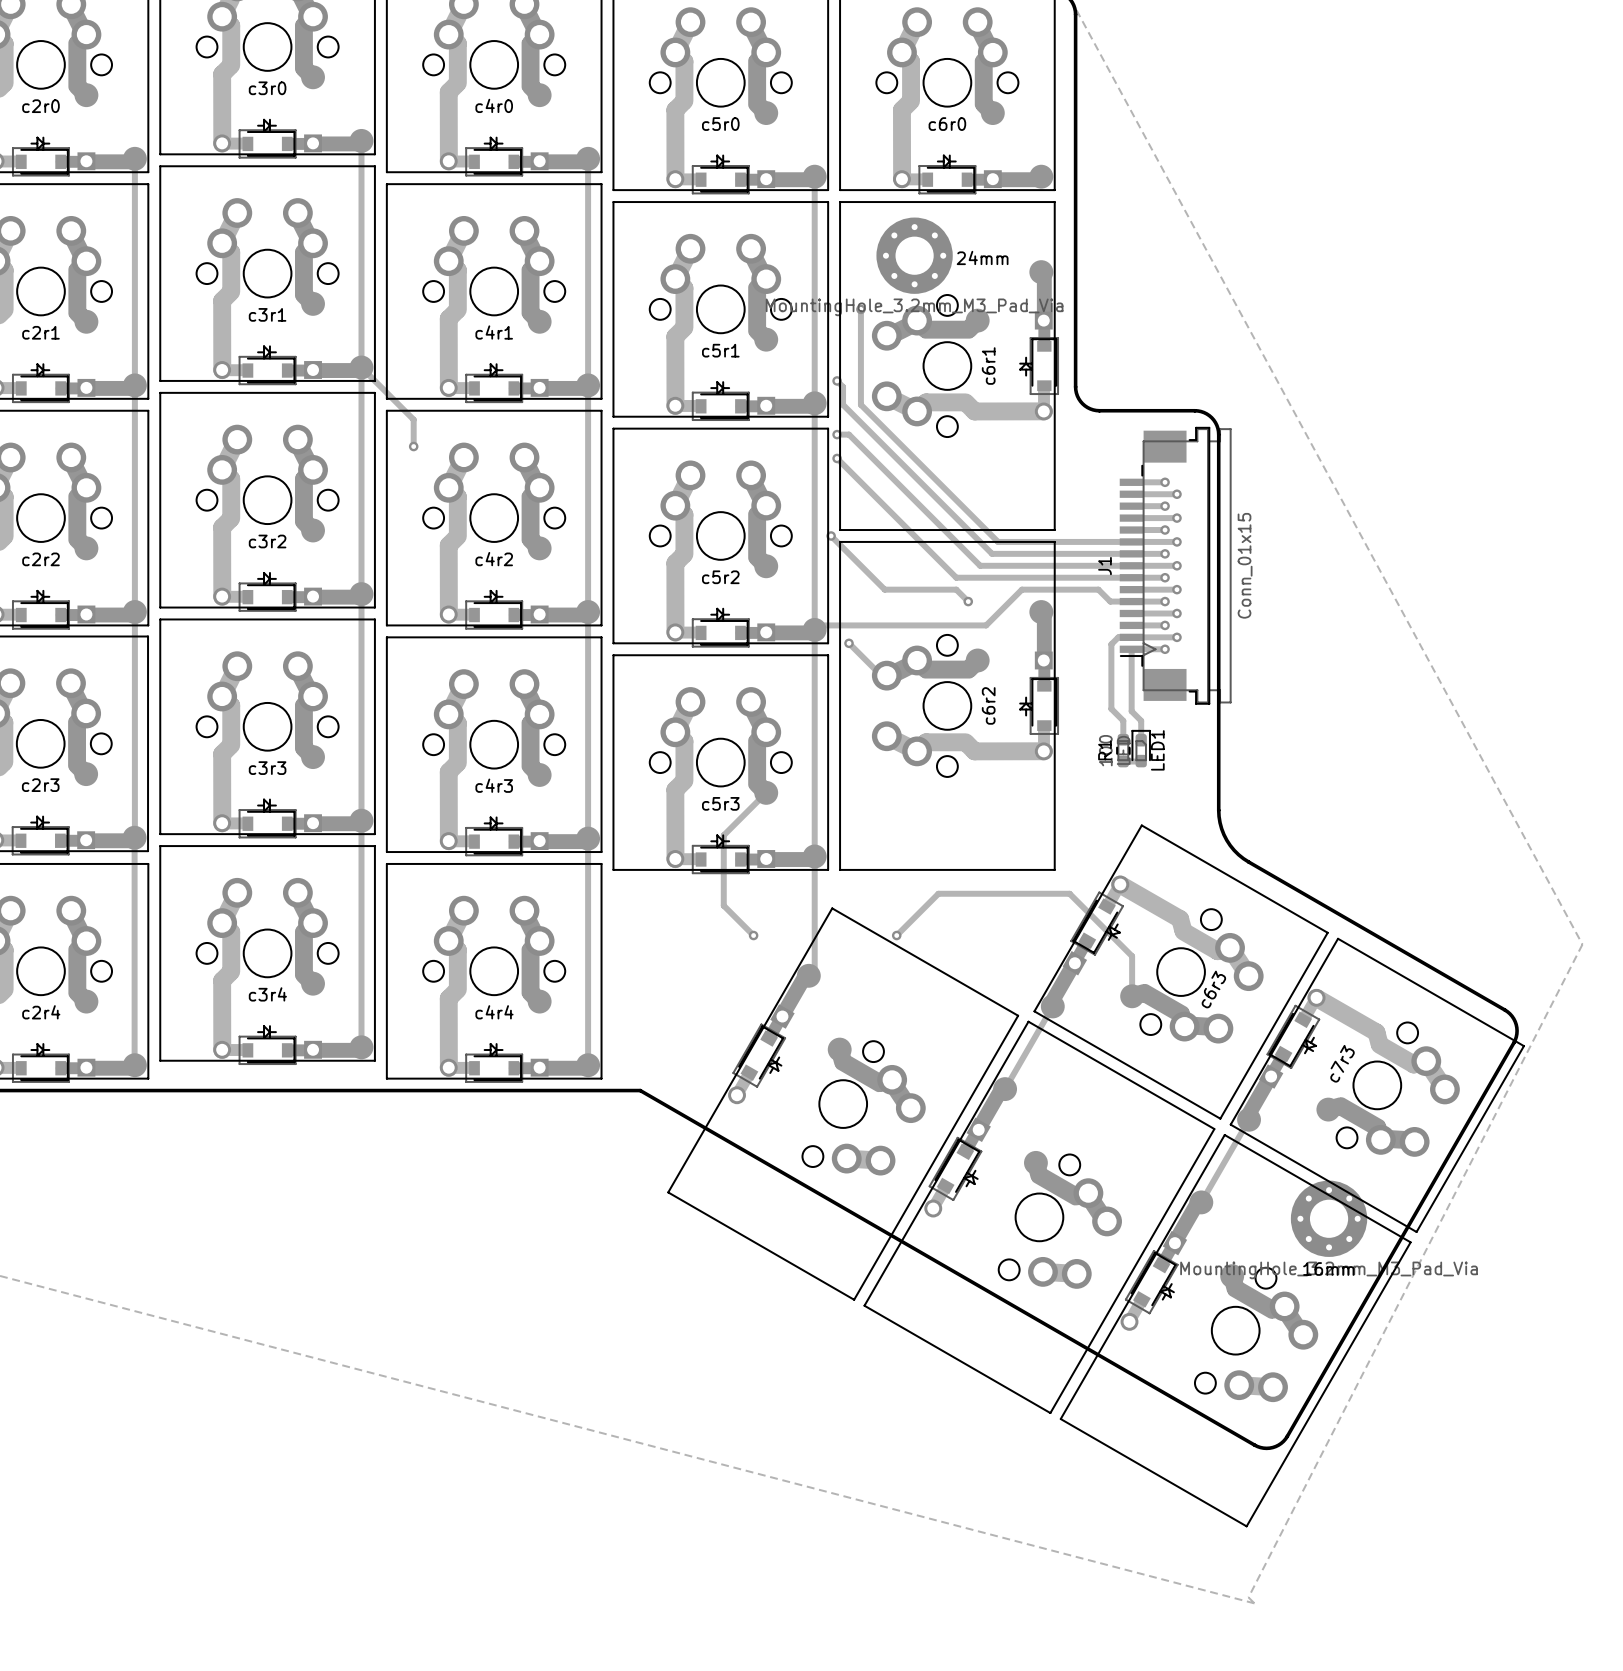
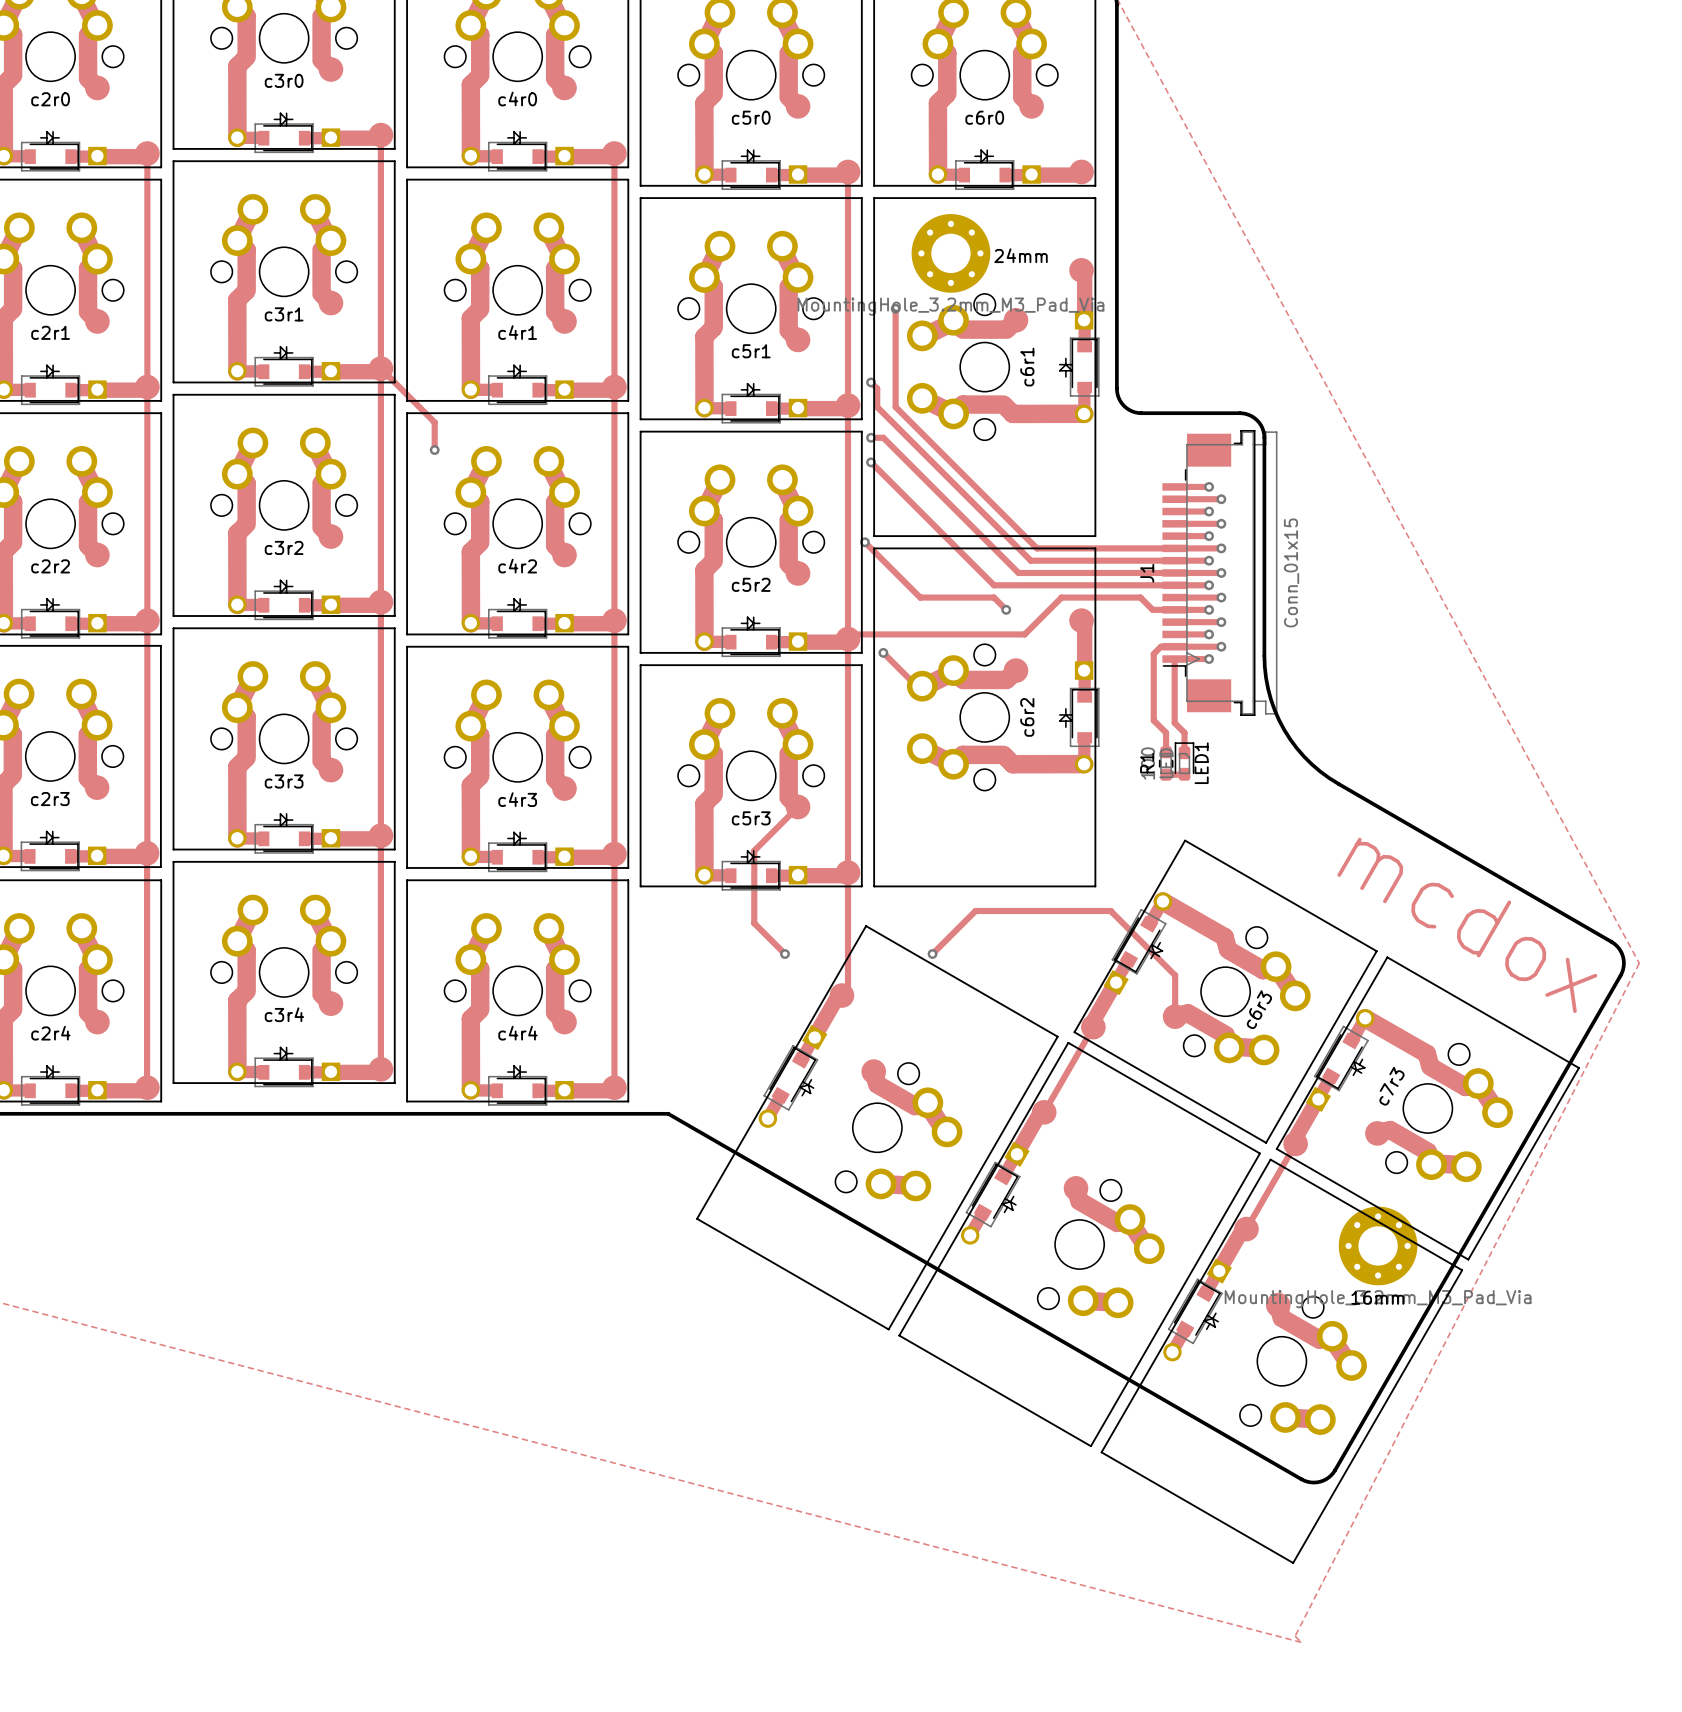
board edge: (1218, 646) (1219, 816) (1221, 828) (1230, 845) (1248, 862) (1504, 1010) (1513, 1018) (1516, 1027) (1513, 1042) (1287, 1436) -> (1264, 655) (1268, 688) (1279, 720) (1296, 748) (1320, 771) (1611, 941) (1618, 948) (1623, 960) (1620, 975) (1335, 1470)
text: none -> mcdox (1467, 925)

